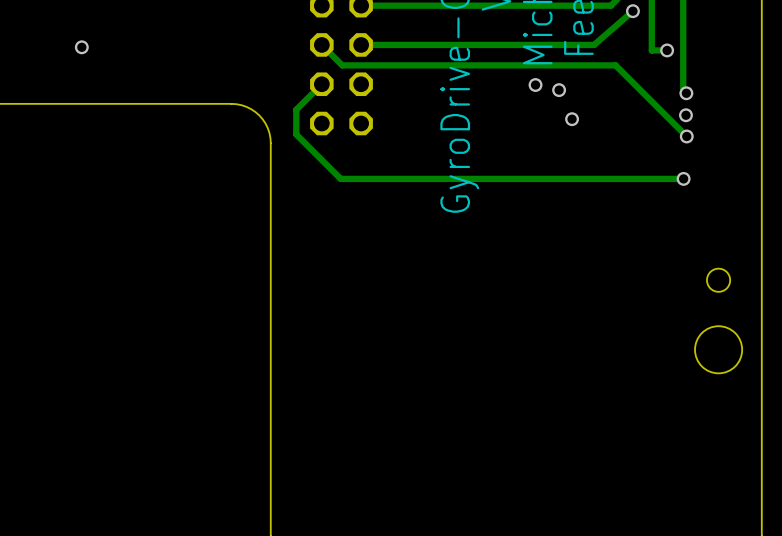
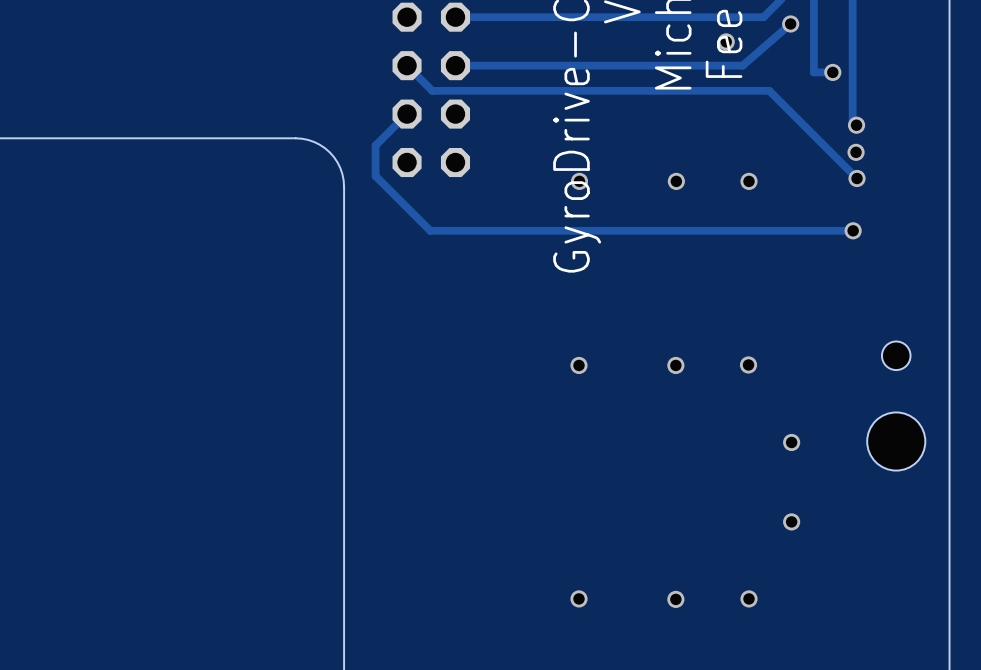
via: none -> (726, 41)
via: (81, 47) -> none
via: (535, 85) -> none
via: (559, 90) -> none
via: (572, 119) -> none
via: none -> (579, 181)
via: none -> (676, 181)
via: none -> (749, 181)
via: none -> (748, 364)
via: none -> (578, 365)
via: none -> (675, 365)
via: none -> (791, 442)
via: none -> (791, 521)
via: none -> (578, 598)
via: none -> (675, 599)
via: none -> (749, 598)

